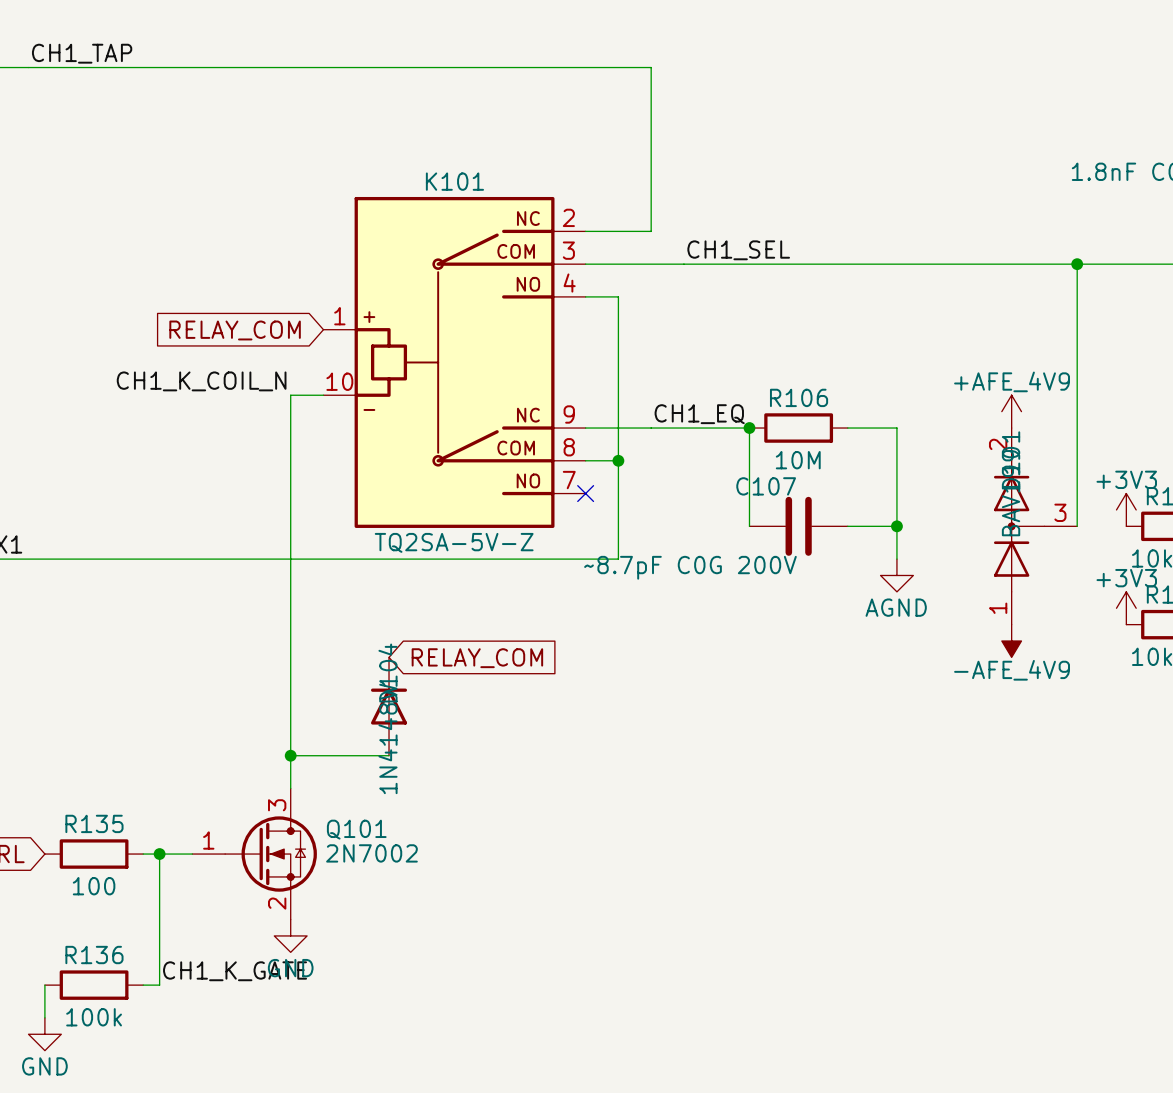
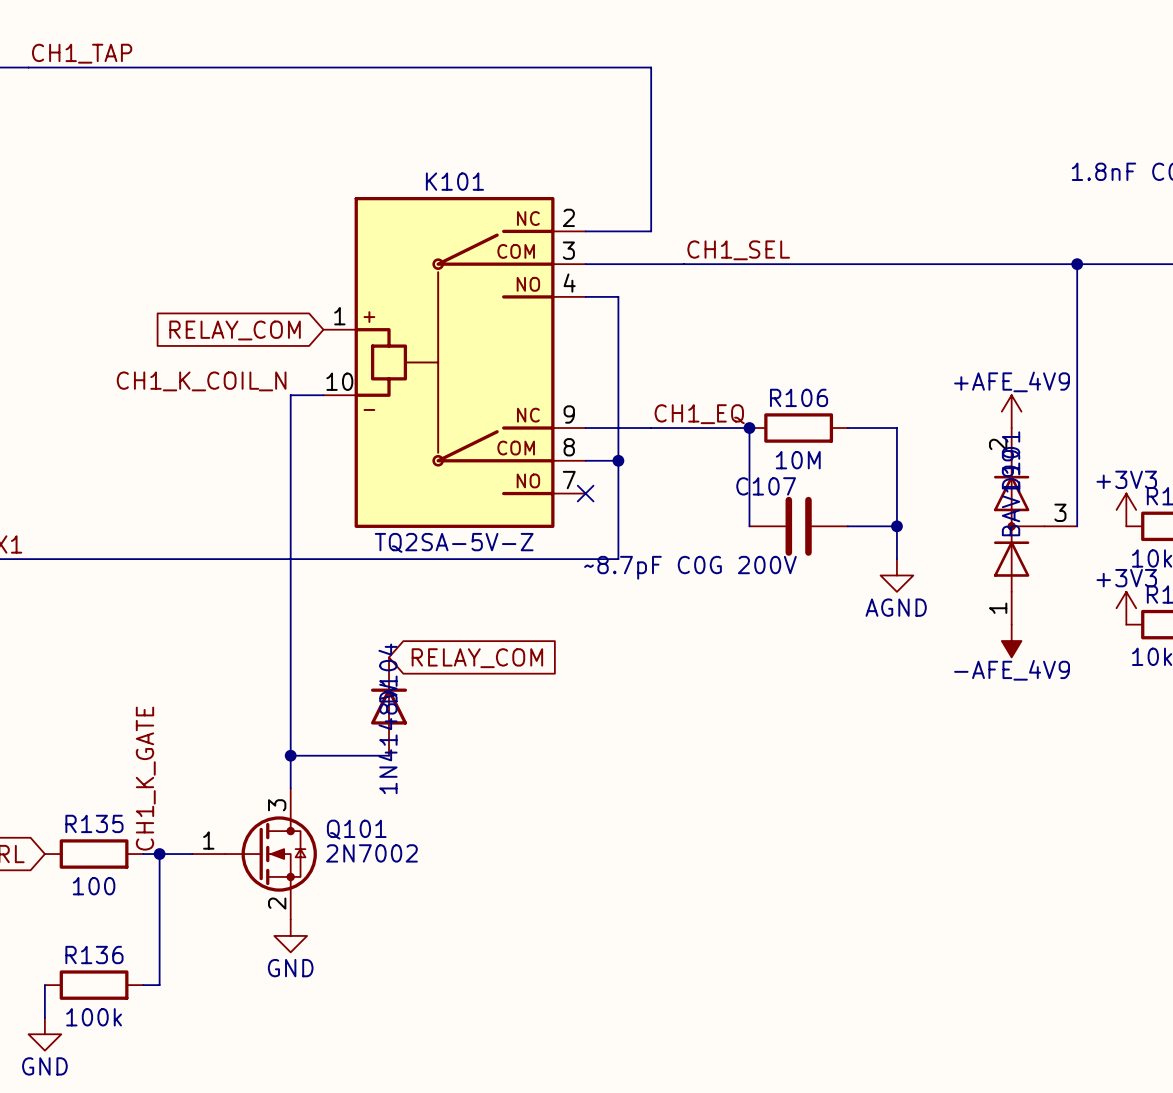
label rotation: 0° (235, 971) -> 90° counterclockwise (145, 778)
label position: CH1_K_GATE (235, 971) -> CH1_K_GATE (145, 778)

